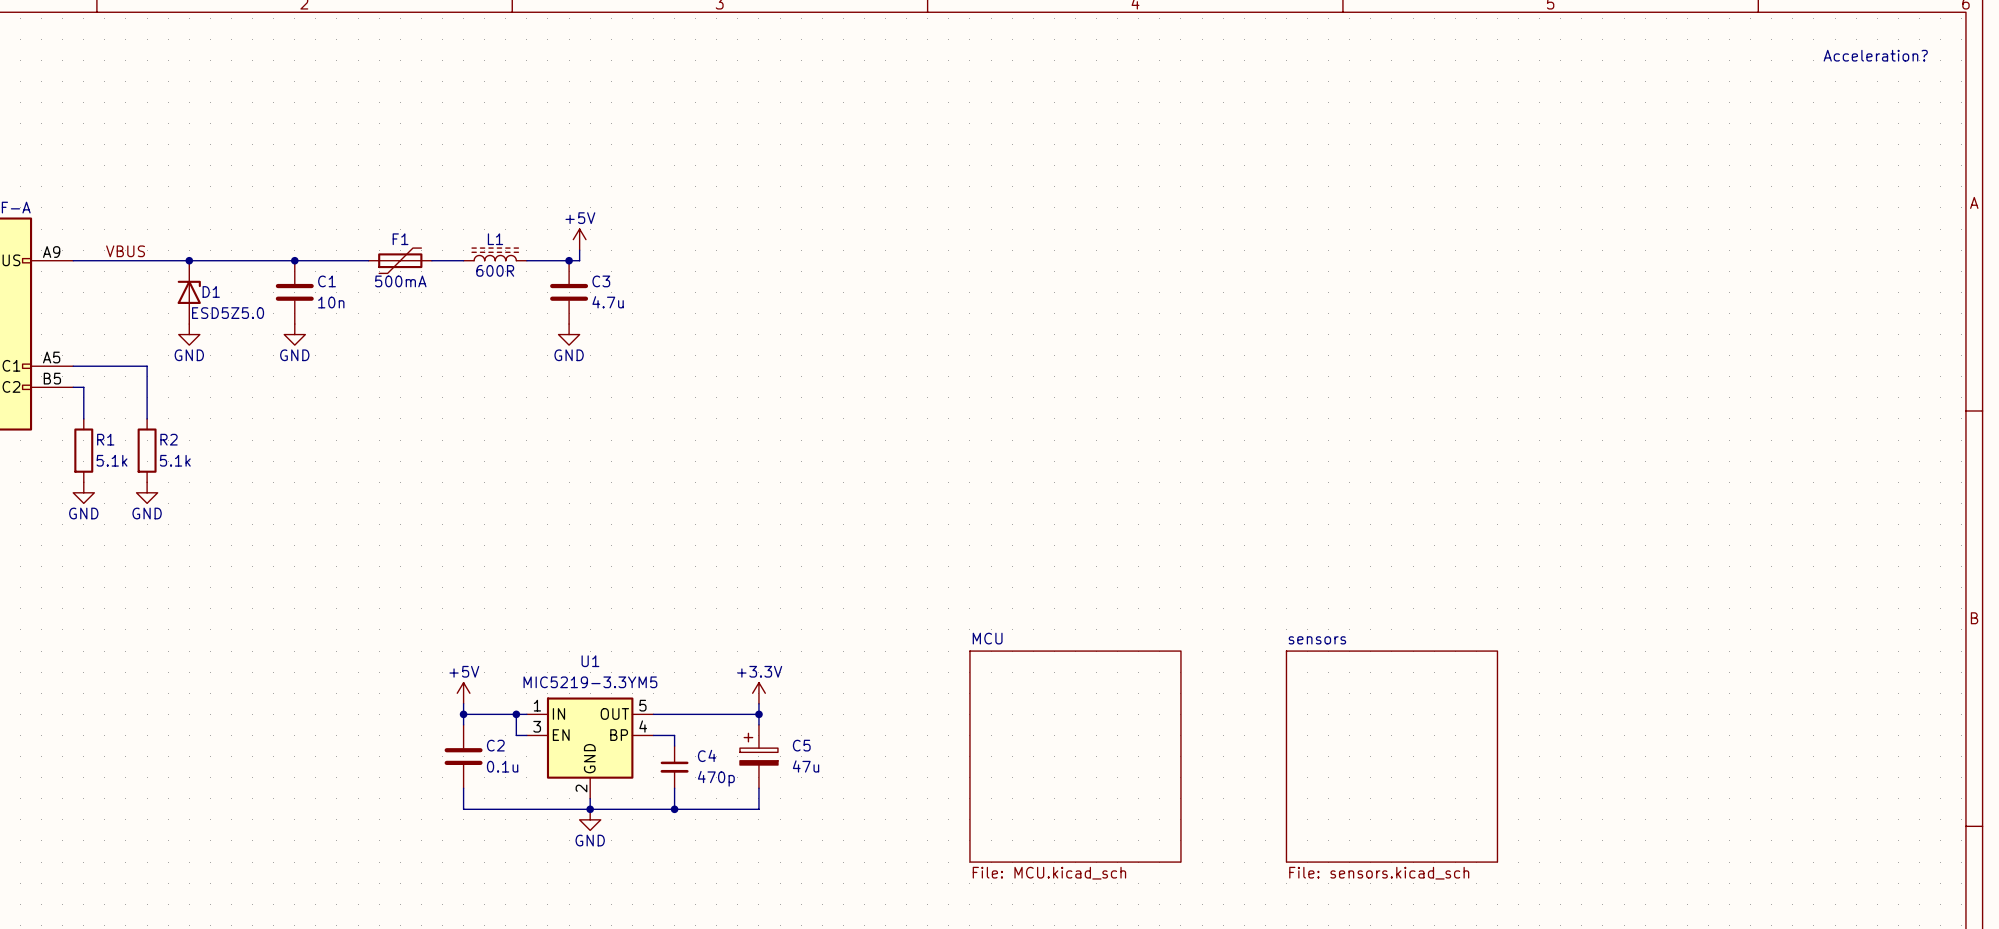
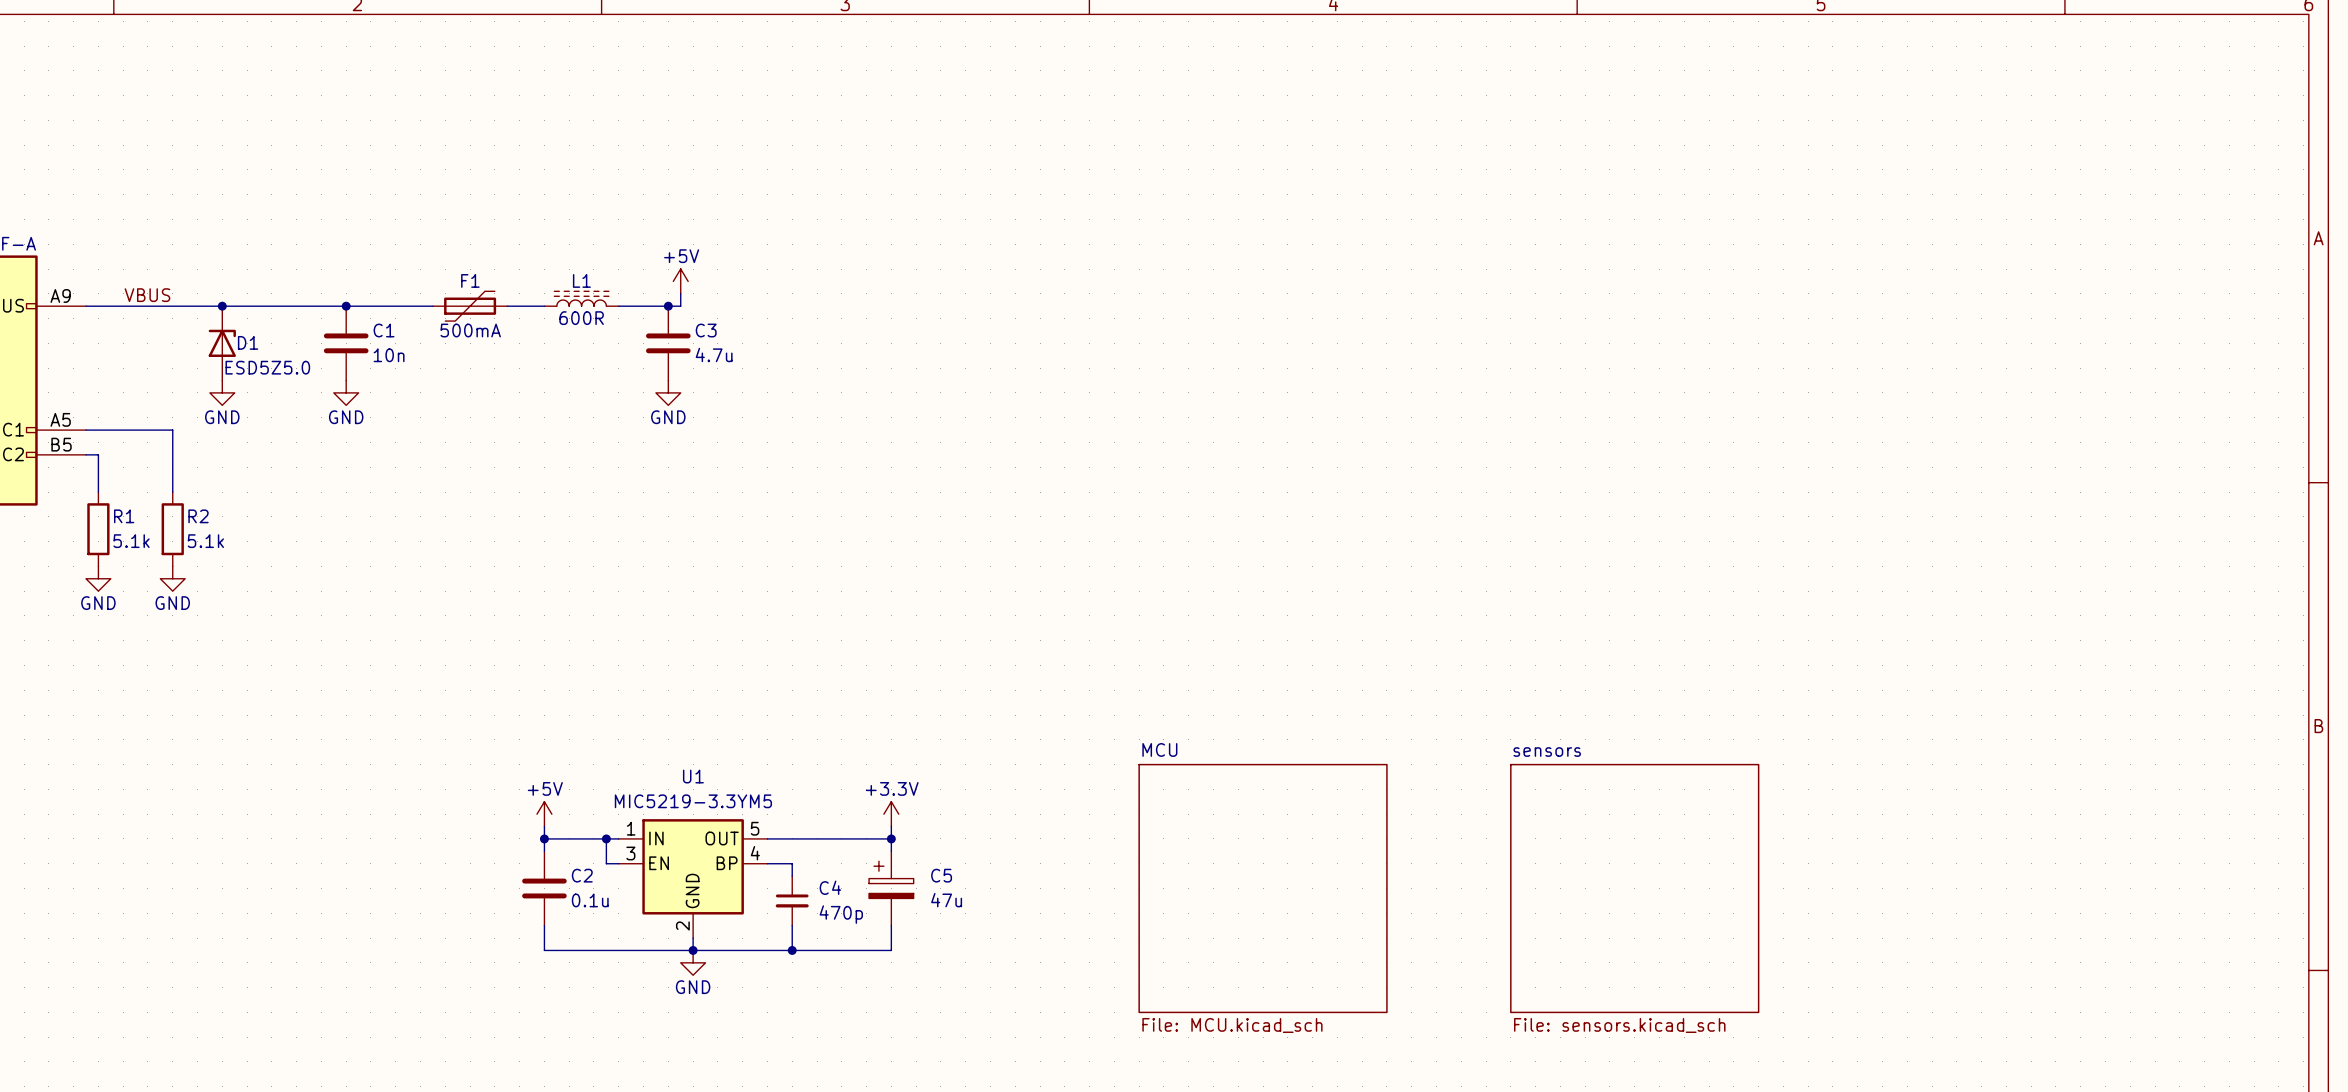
text: Acceleration? (1875, 55) -> none

